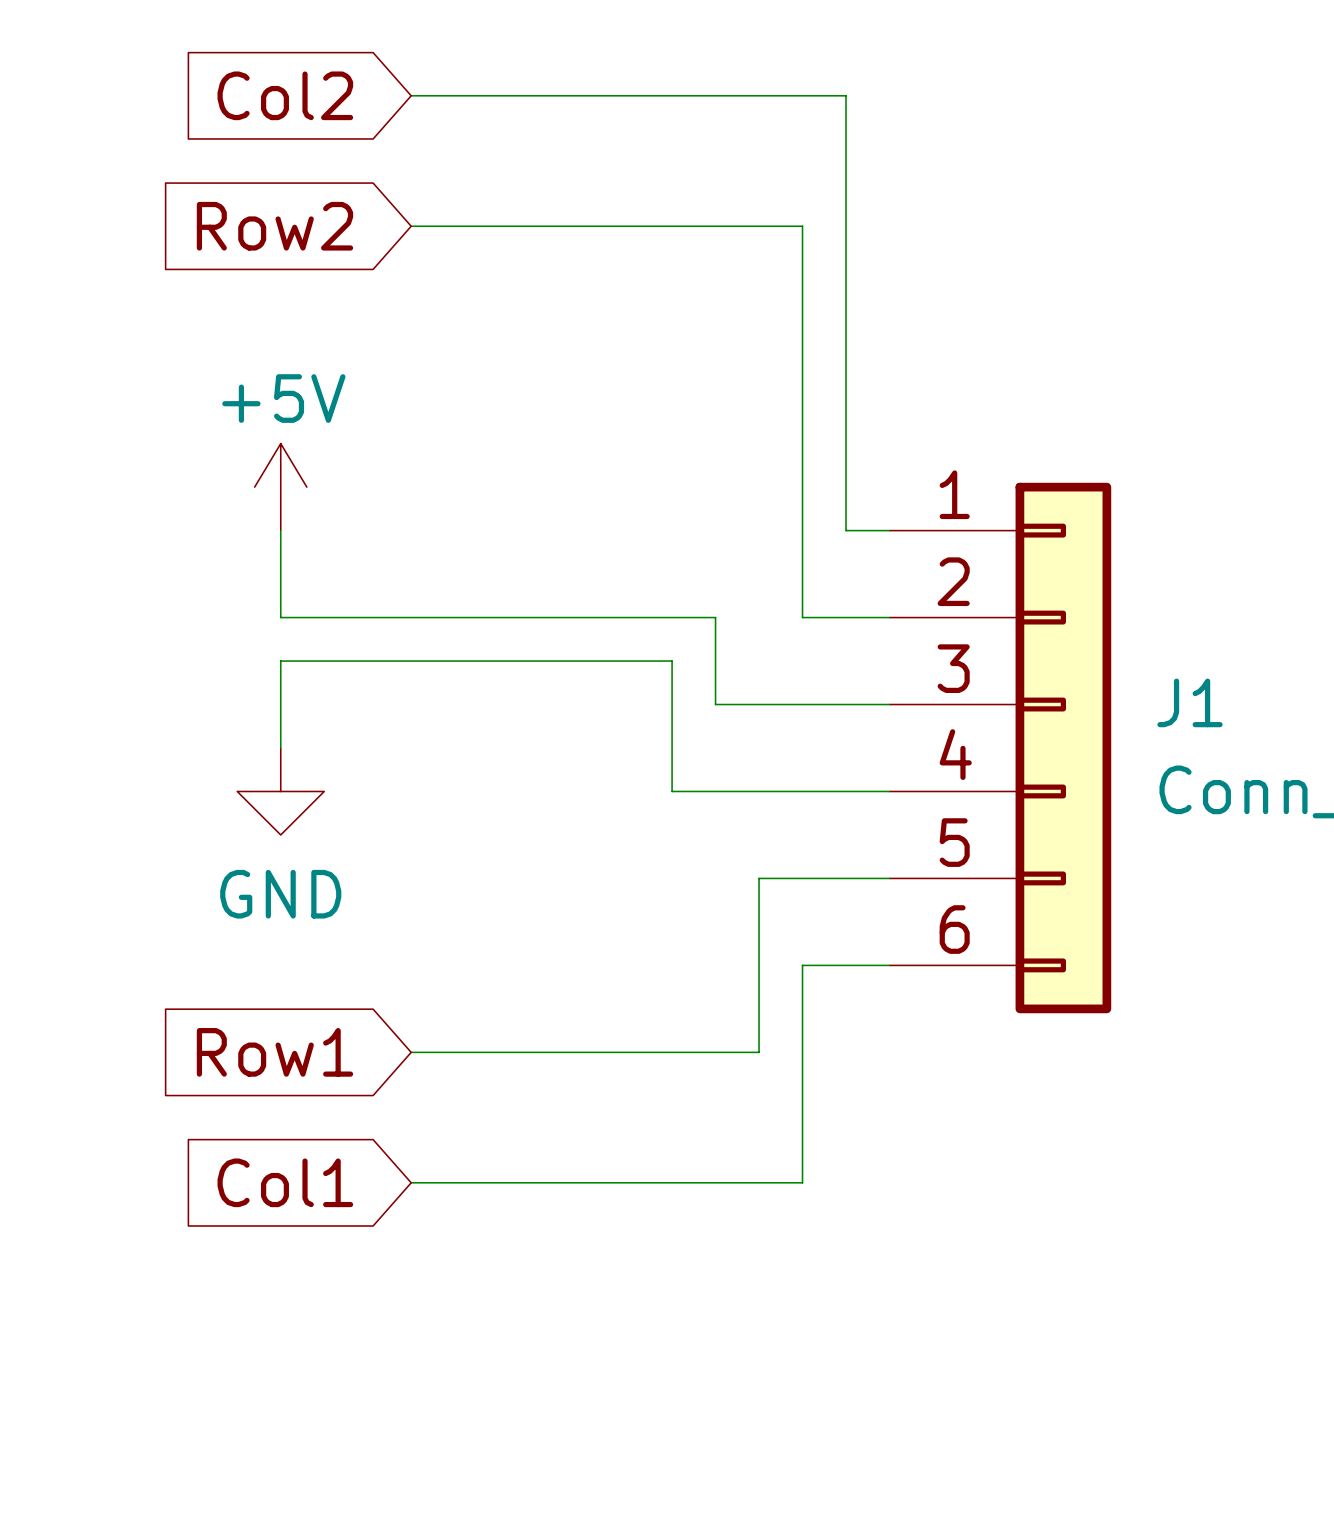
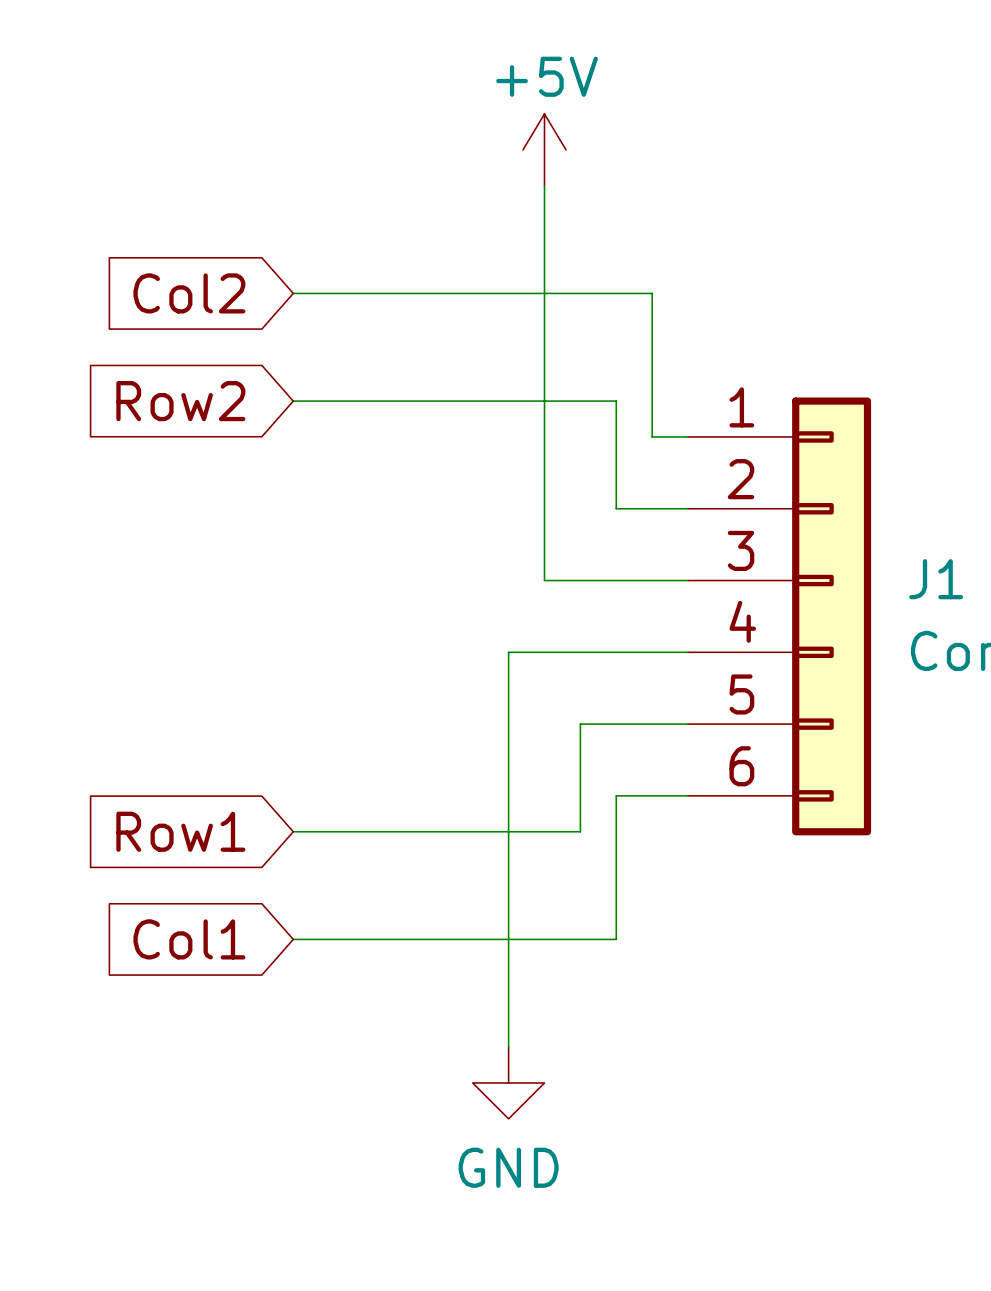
global label position: Col2 (285, 95) -> Col2 (189, 293)
wire: (411, 95) (845, 95) (845, 356) -> (293, 293) (652, 293)
global label position: Row2 (274, 226) -> Row2 (180, 401)
wire: (411, 226) (802, 226) (802, 487) -> (293, 401) (616, 401)
power symbol position: +5V (280, 487) -> +5V (544, 149)
wire: (280, 530) (280, 617) (715, 617) -> (544, 185) (544, 508)
wire: (280, 748) (280, 661) (672, 661) (672, 791) -> (508, 1047) (508, 652)
power symbol position: GND (280, 791) -> GND (508, 1082)
wire: (759, 1008) (759, 1052) (411, 1052) -> (580, 831) (293, 831)
global label position: Row1 (274, 1052) -> Row1 (180, 831)
wire: (802, 1139) (802, 1182) (411, 1182) -> (616, 939) (293, 939)
global label position: Col1 (285, 1182) -> Col1 (189, 939)

